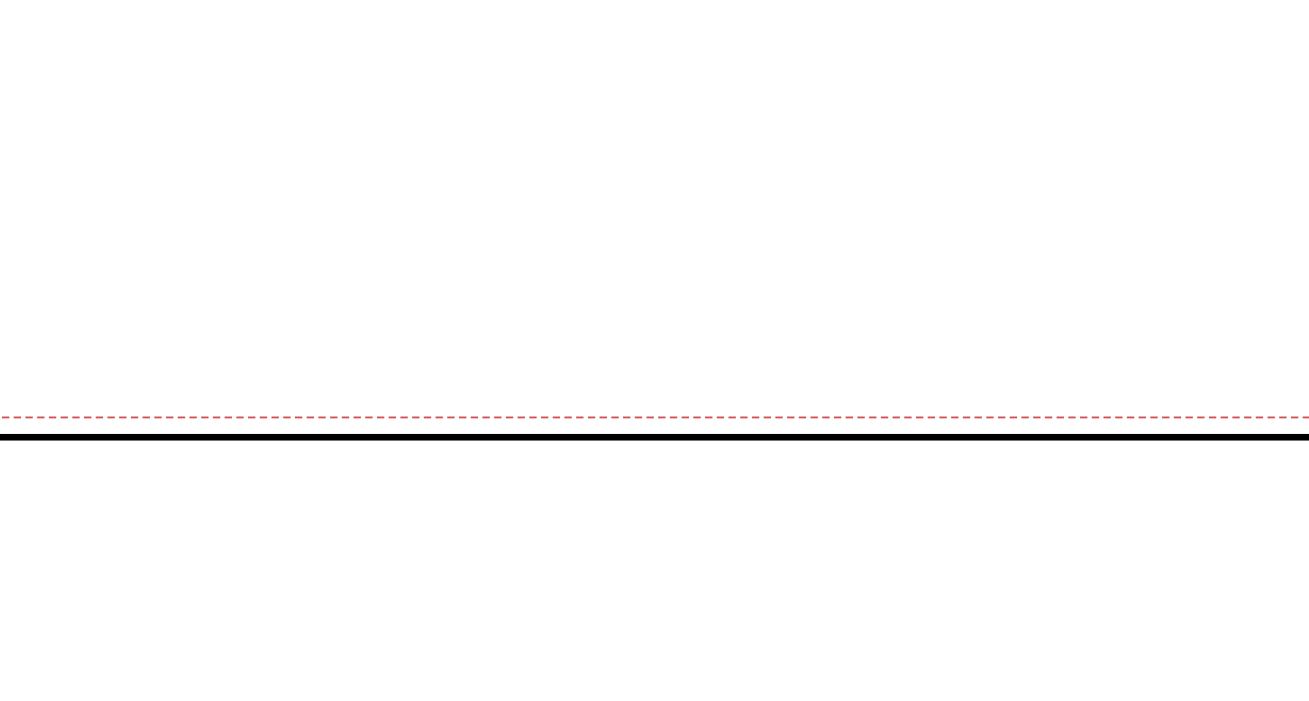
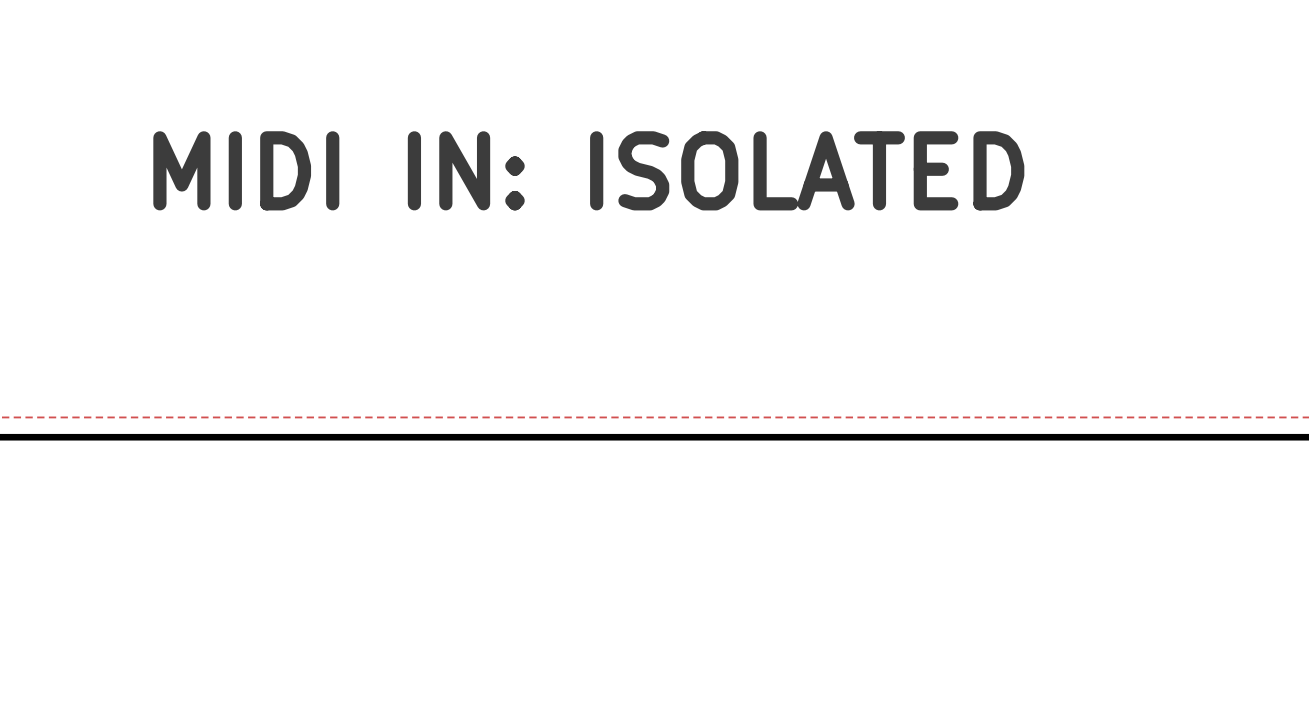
text: none -> MIDI IN: ISOLATED (588, 170)

